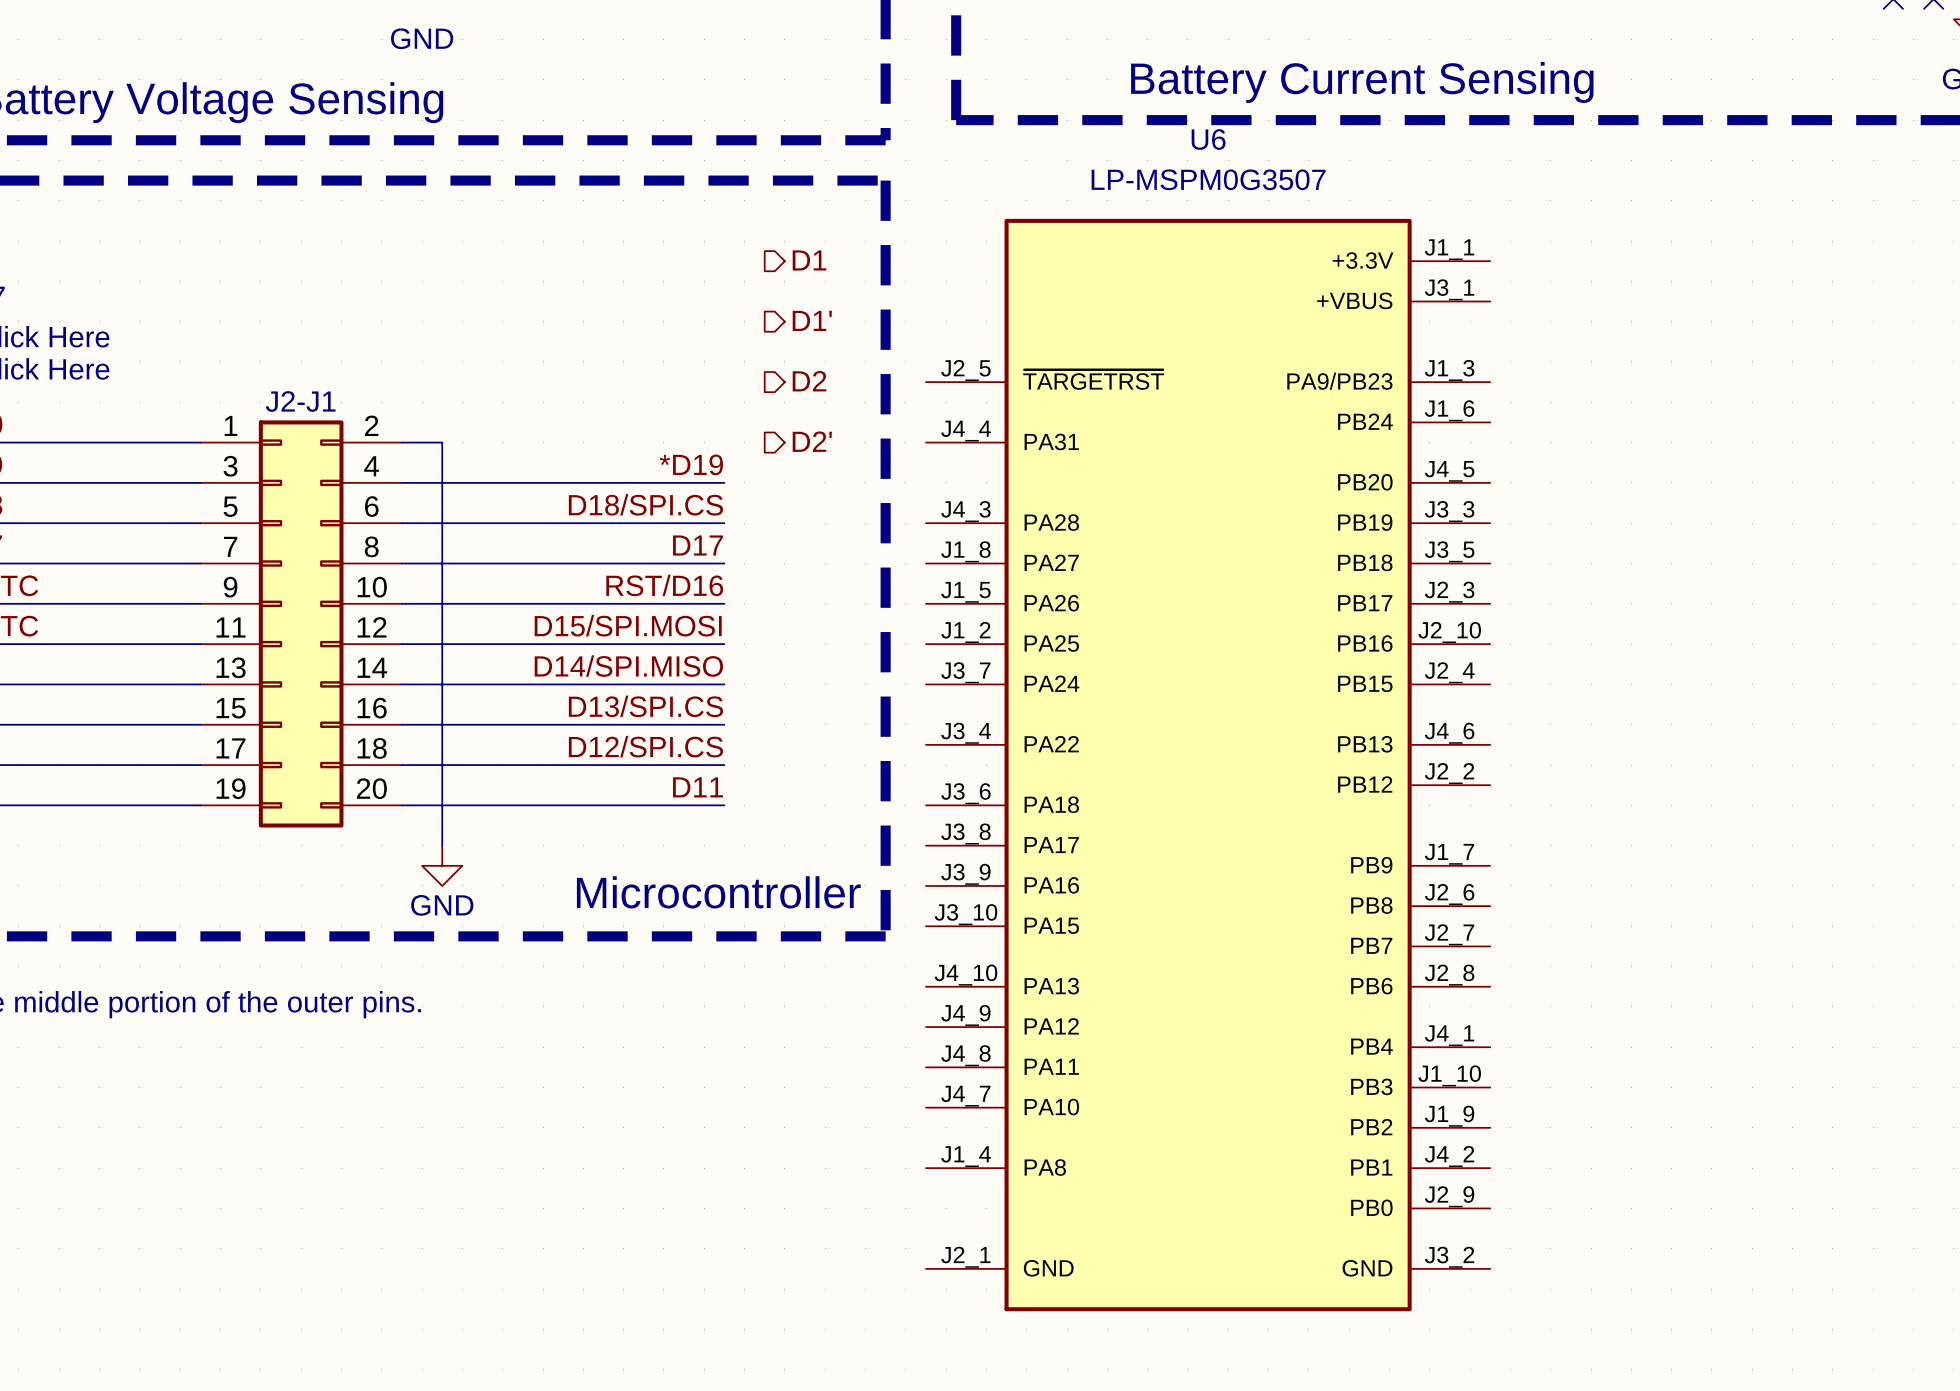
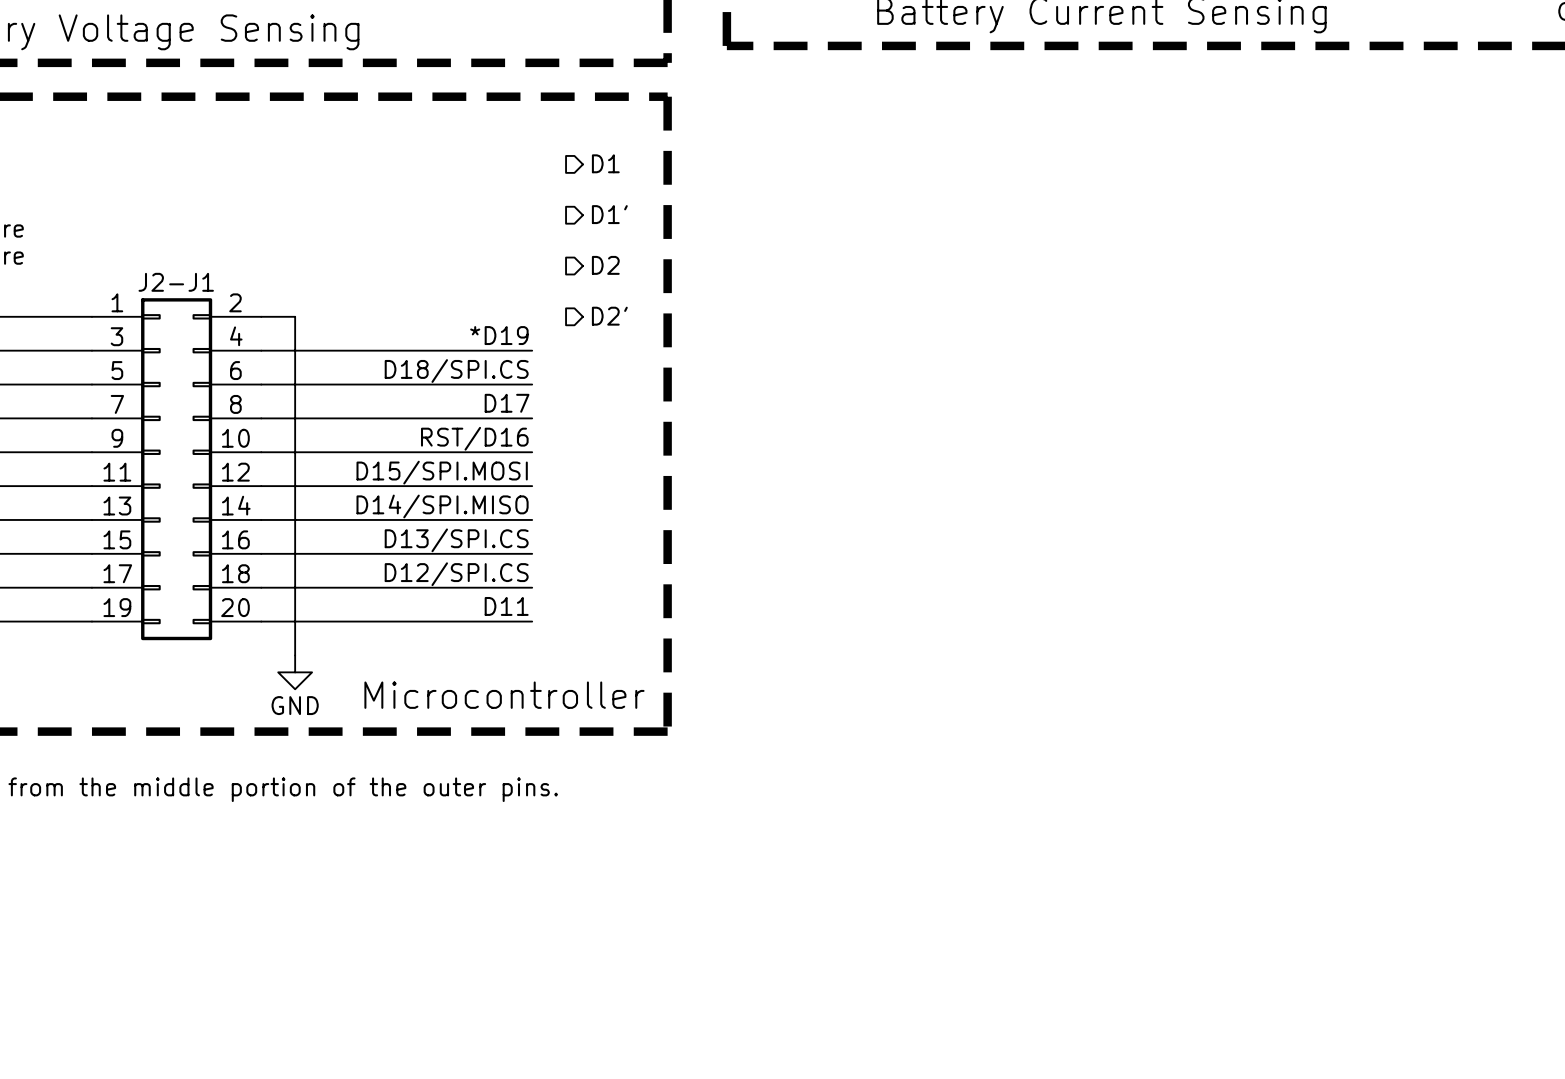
U6: LP-MSPM0G3507 (1208, 765) -> none

